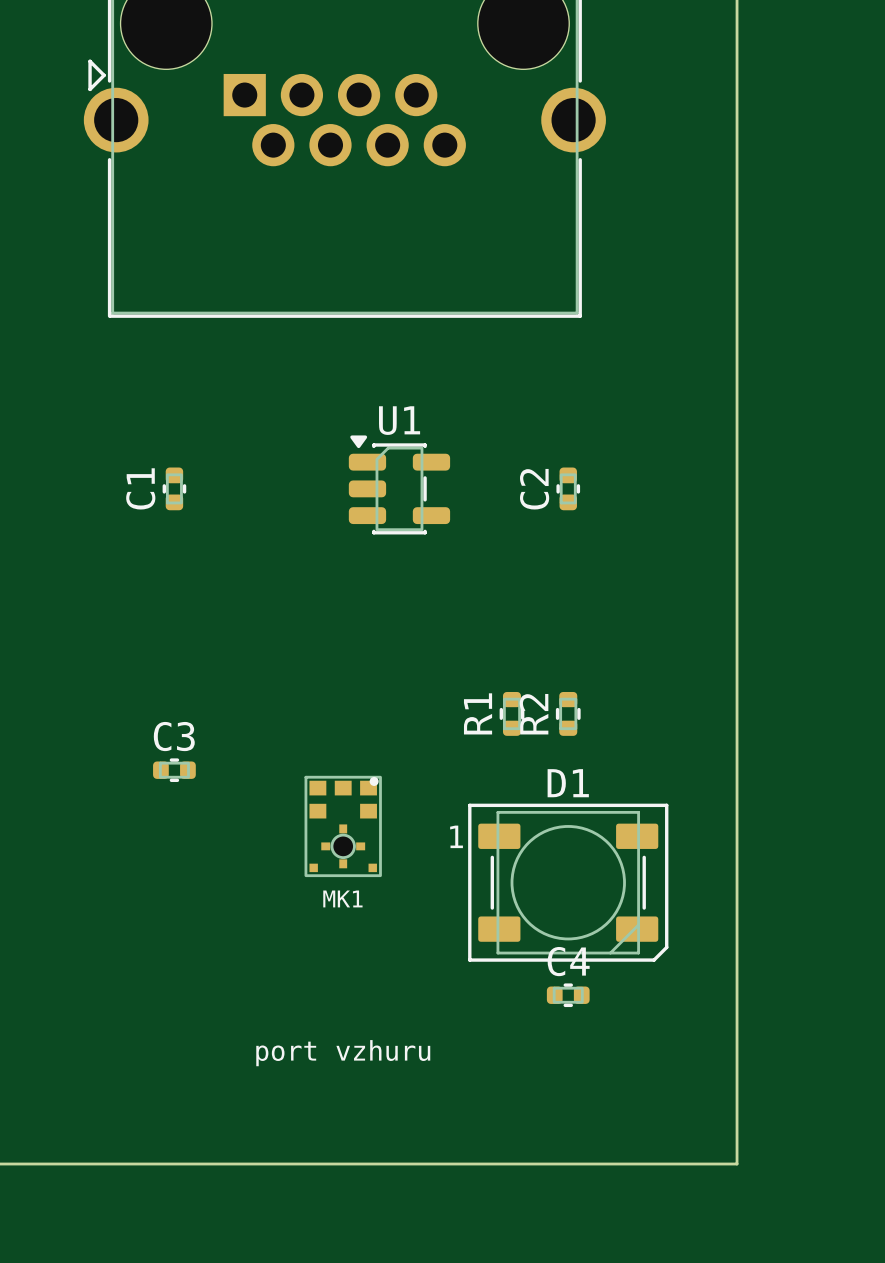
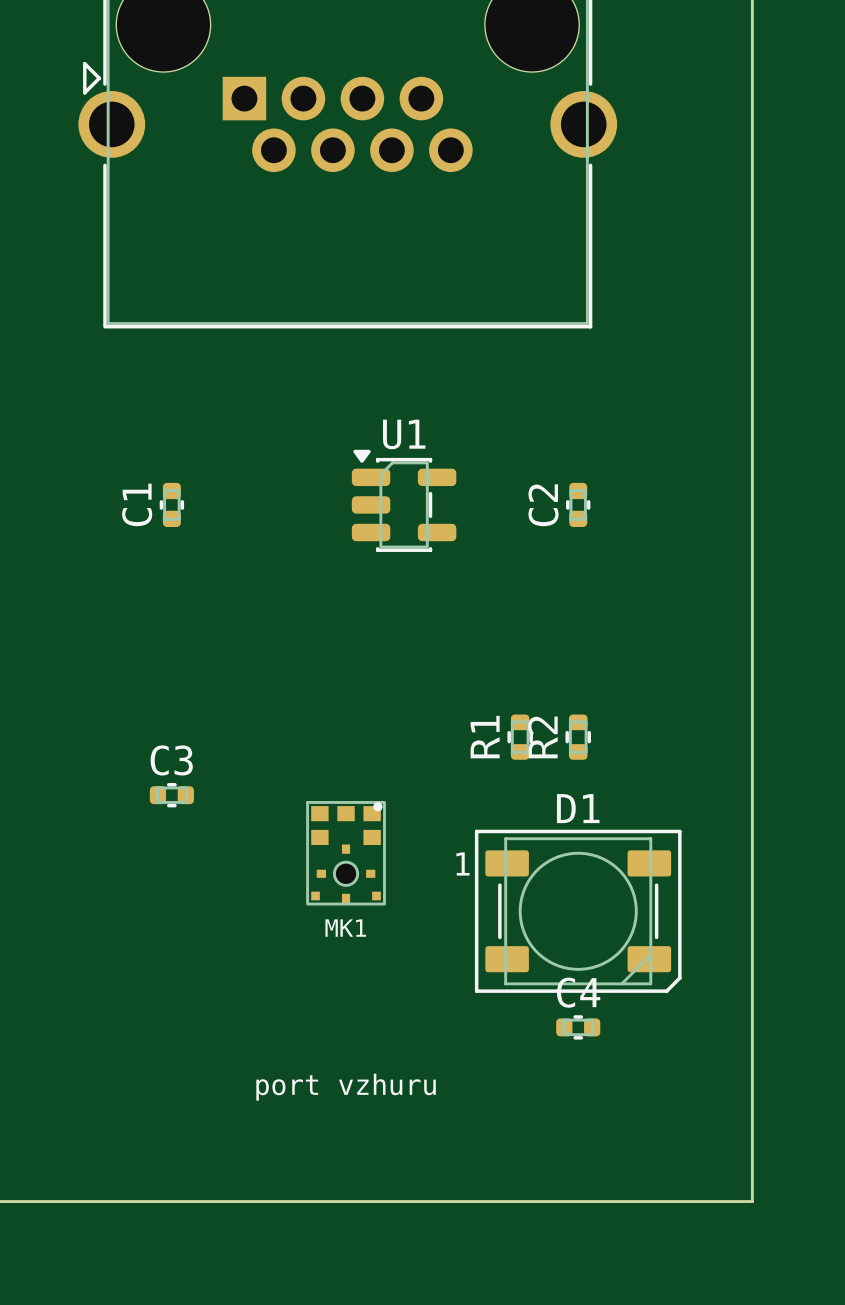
MK1 footprint: [304, 775, 382, 878] -> [306, 801, 386, 906]

